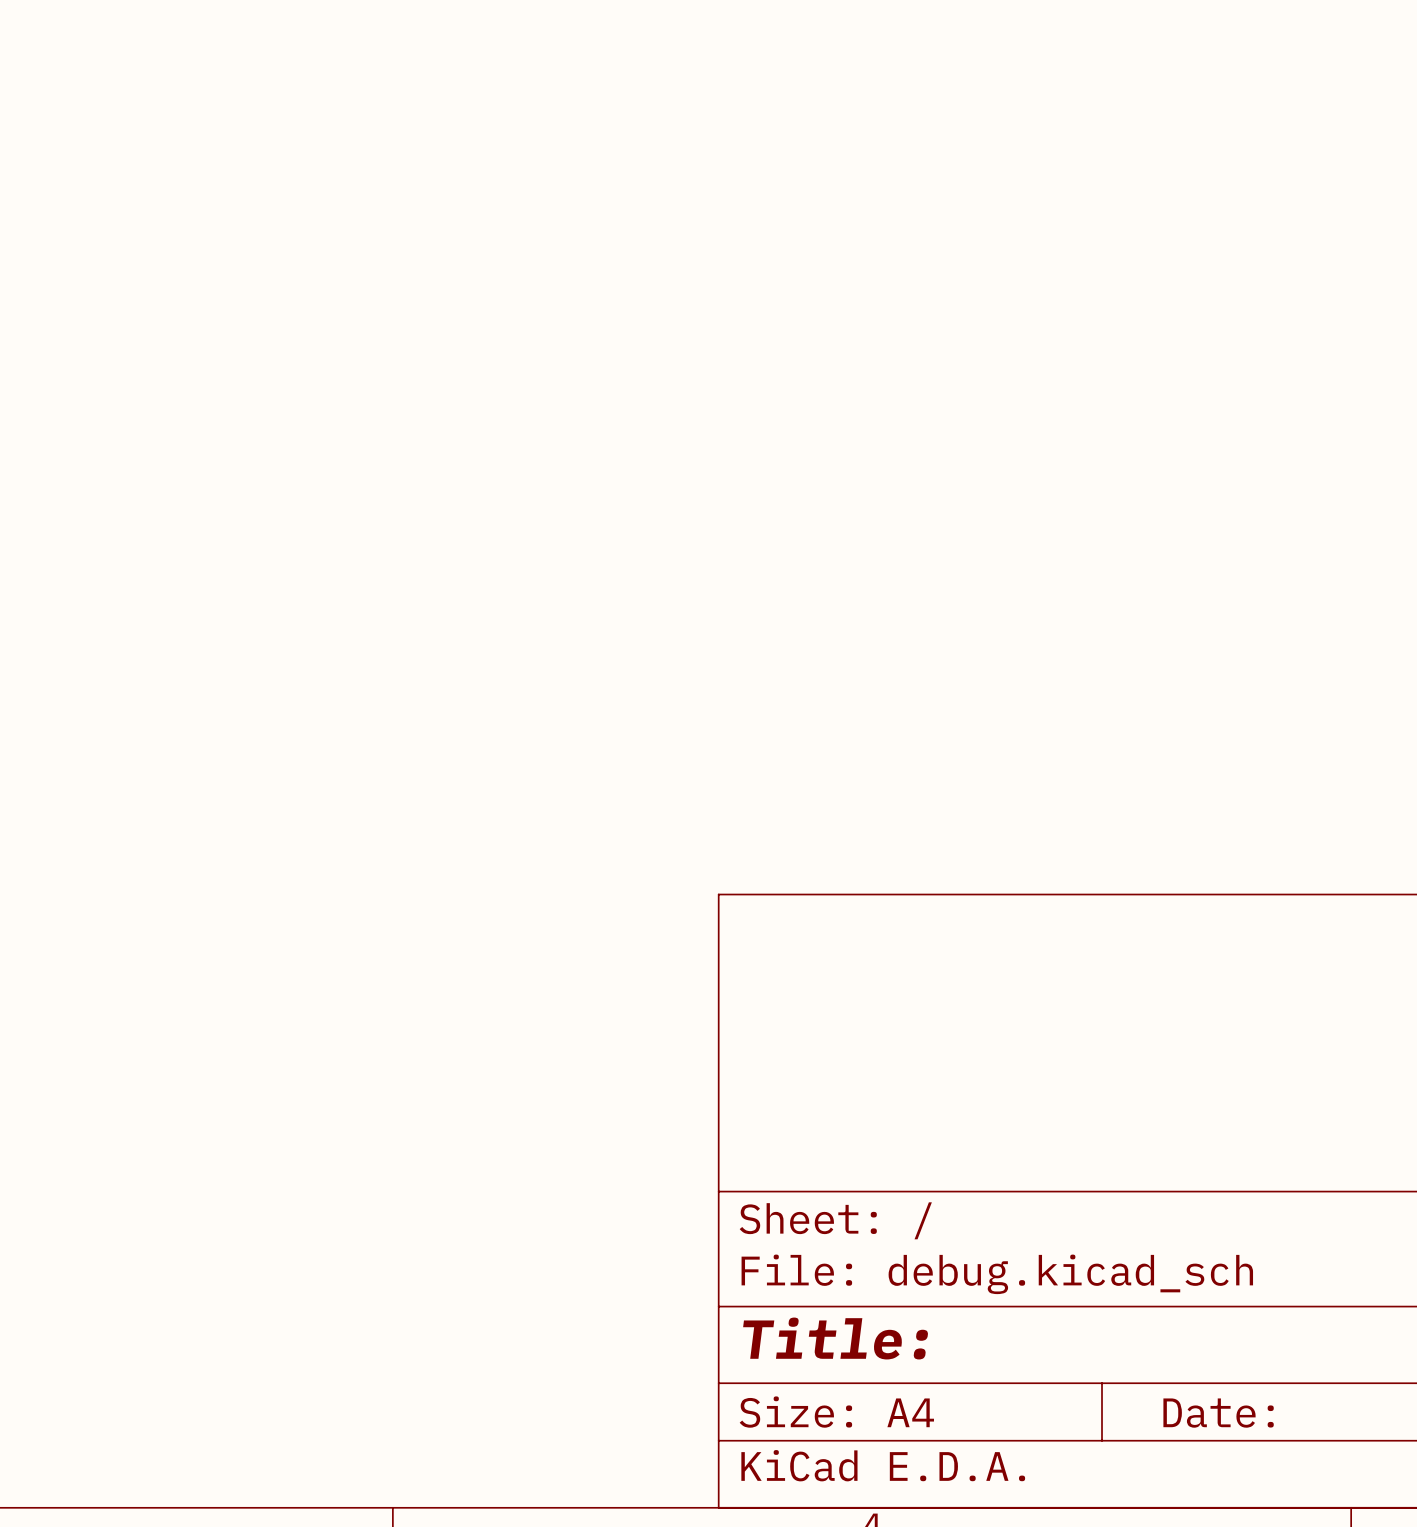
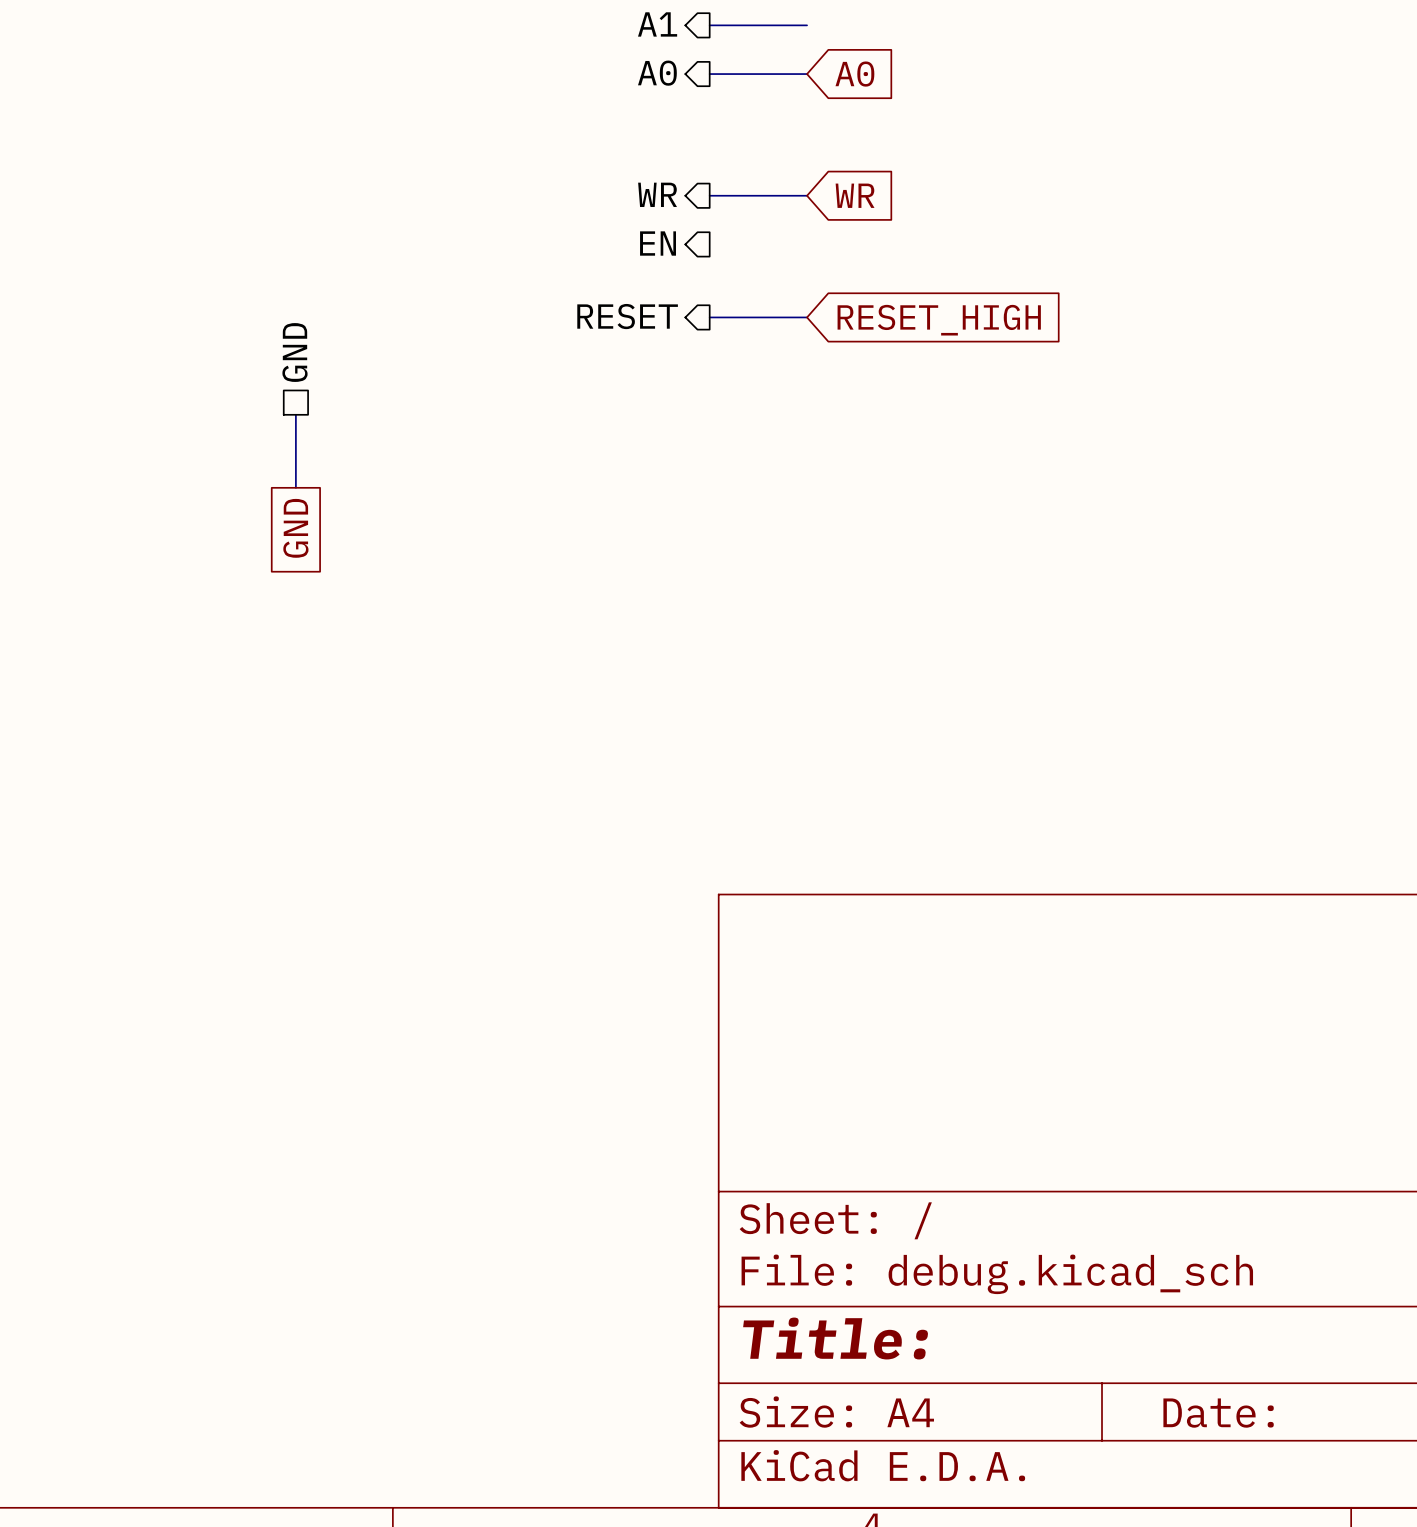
sheet pin: none -> A1 (657, 24)
wire: none -> (709, 25) (807, 25)
sheet pin: none -> A0 (657, 73)
wire: none -> (709, 74) (807, 74)
global label: none -> A0 (854, 74)
sheet pin: none -> WR (657, 194)
wire: none -> (709, 195) (807, 195)
global label: none -> WR (855, 195)
sheet pin: none -> EN (658, 243)
sheet pin: none -> RESET (627, 316)
wire: none -> (709, 317) (807, 317)
global label: none -> RESET_HIGH (939, 320)
sheet pin: none -> GND (294, 352)
wire: none -> (295, 414) (295, 487)
global label: none -> GND (295, 528)

